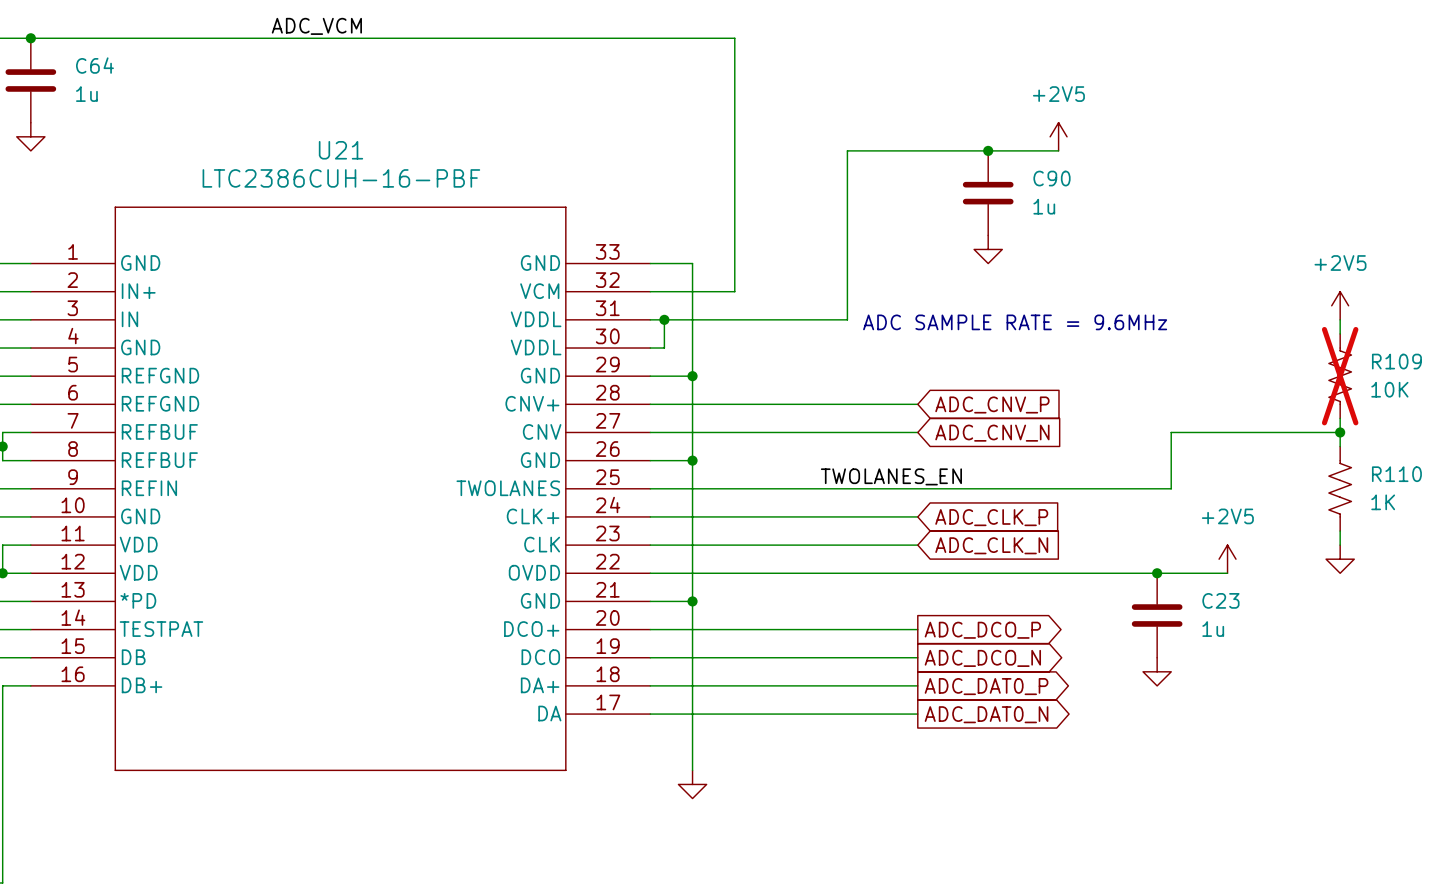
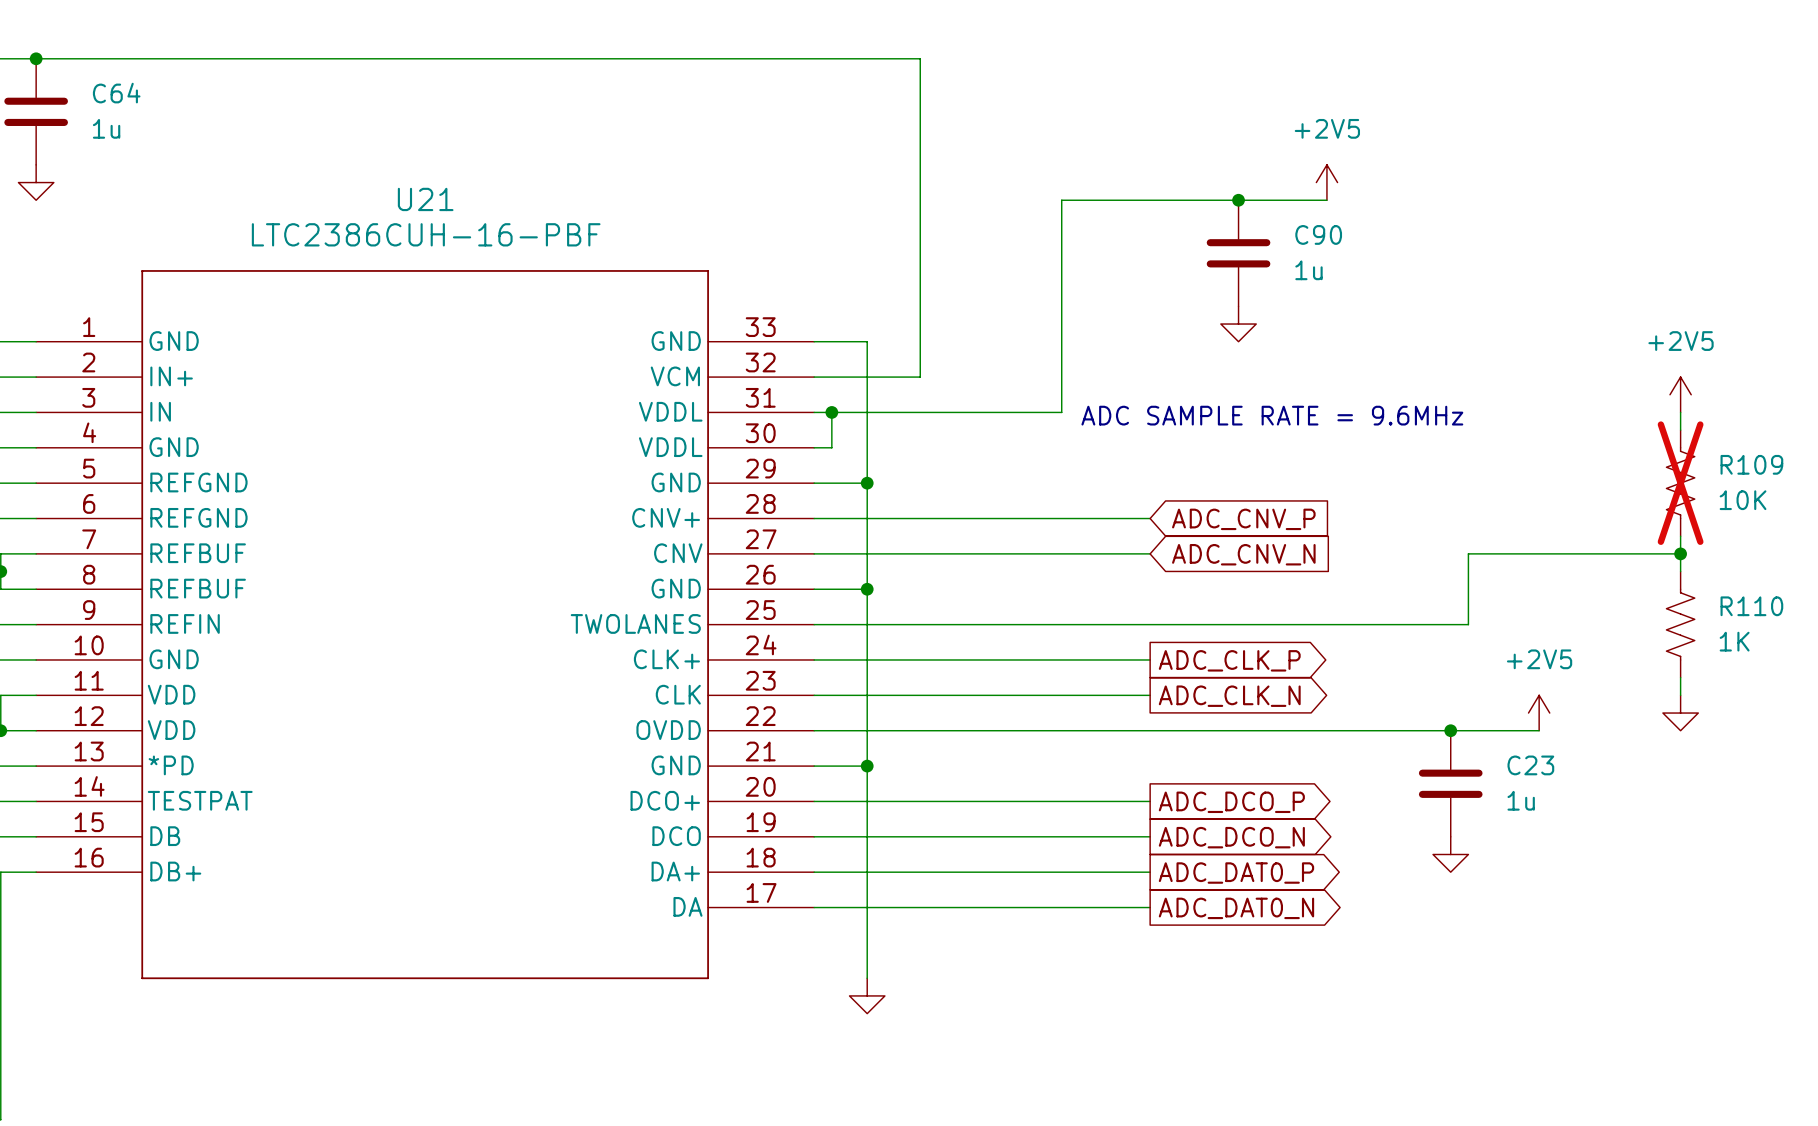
label: ADC_VCM (316, 26) -> none
label: TWOLANES_EN (891, 476) -> none
global label shape: input (991, 517) -> output (1229, 660)
global label shape: input (991, 545) -> output (1229, 696)

